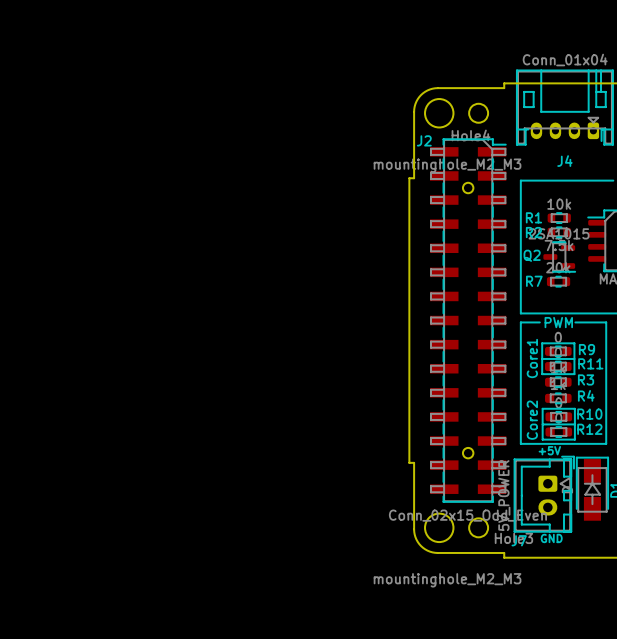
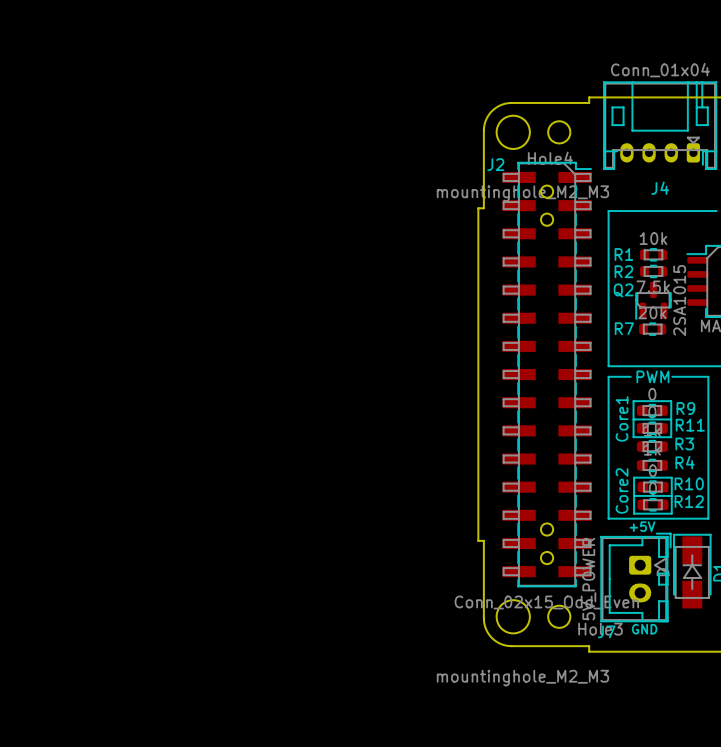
round board edge: none -> [540, 185, 554, 199]
Q2 rotation: 0° (559, 256) -> 90° clockwise (653, 300)
round board edge: none -> [540, 551, 554, 565]

